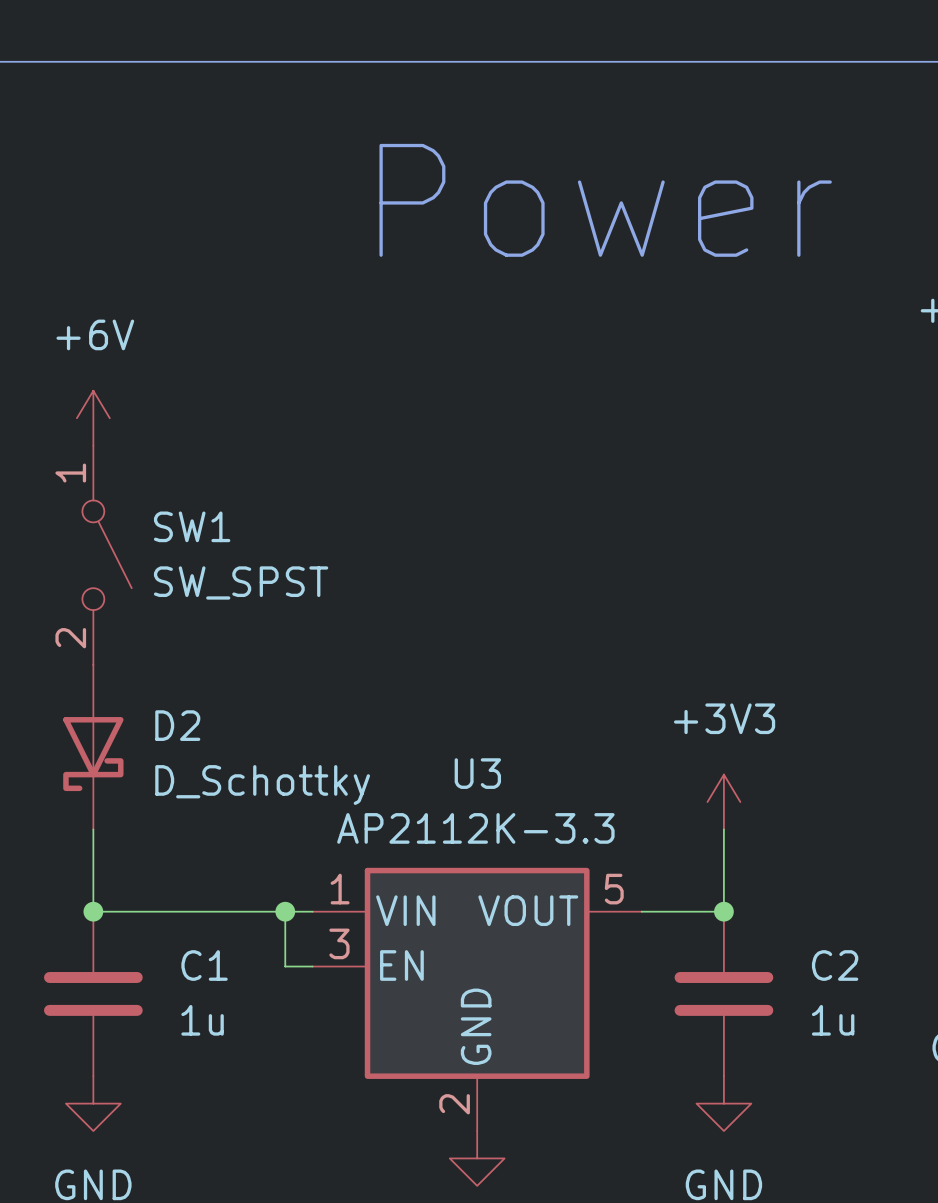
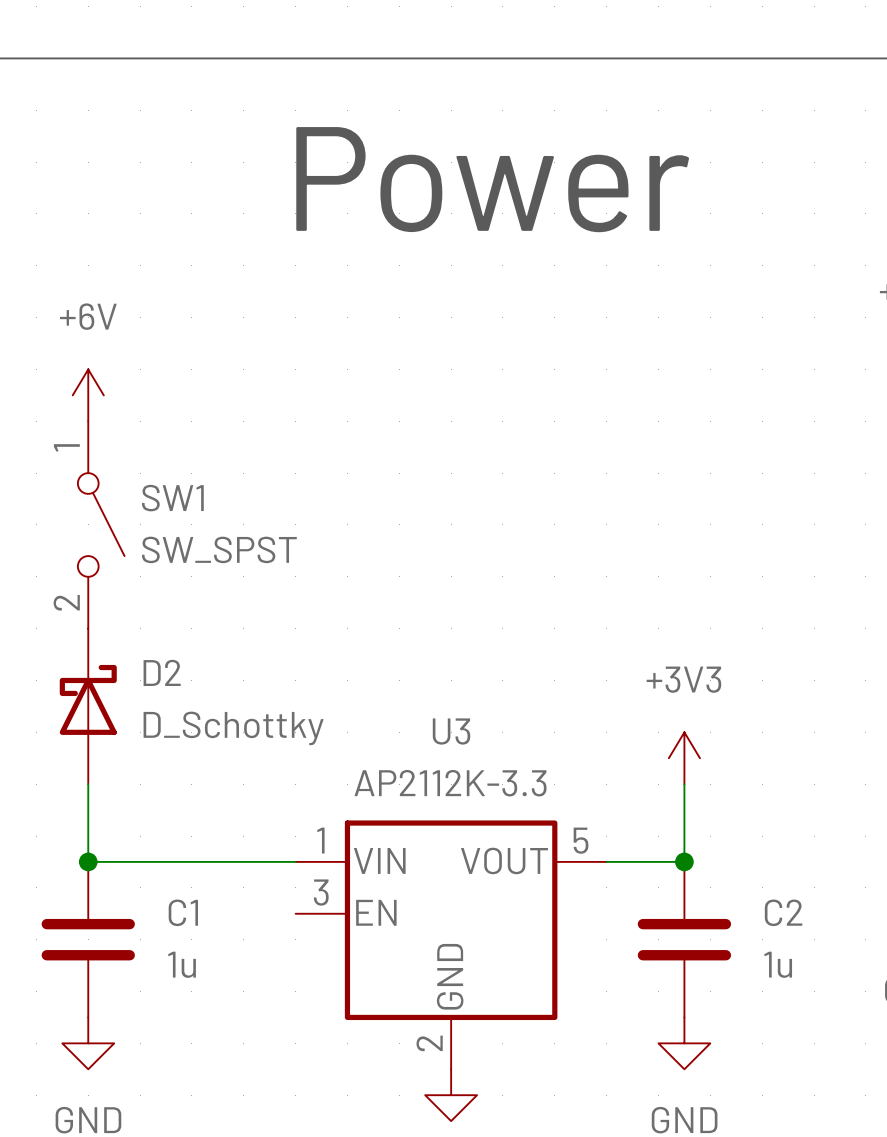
text position: Power (605, 200) -> Power (492, 179)
D2 rotation: 0° (93, 754) -> 180° (88, 699)
wire: (285, 911) (285, 966) (312, 966) -> none
junction: (285, 911) -> none

